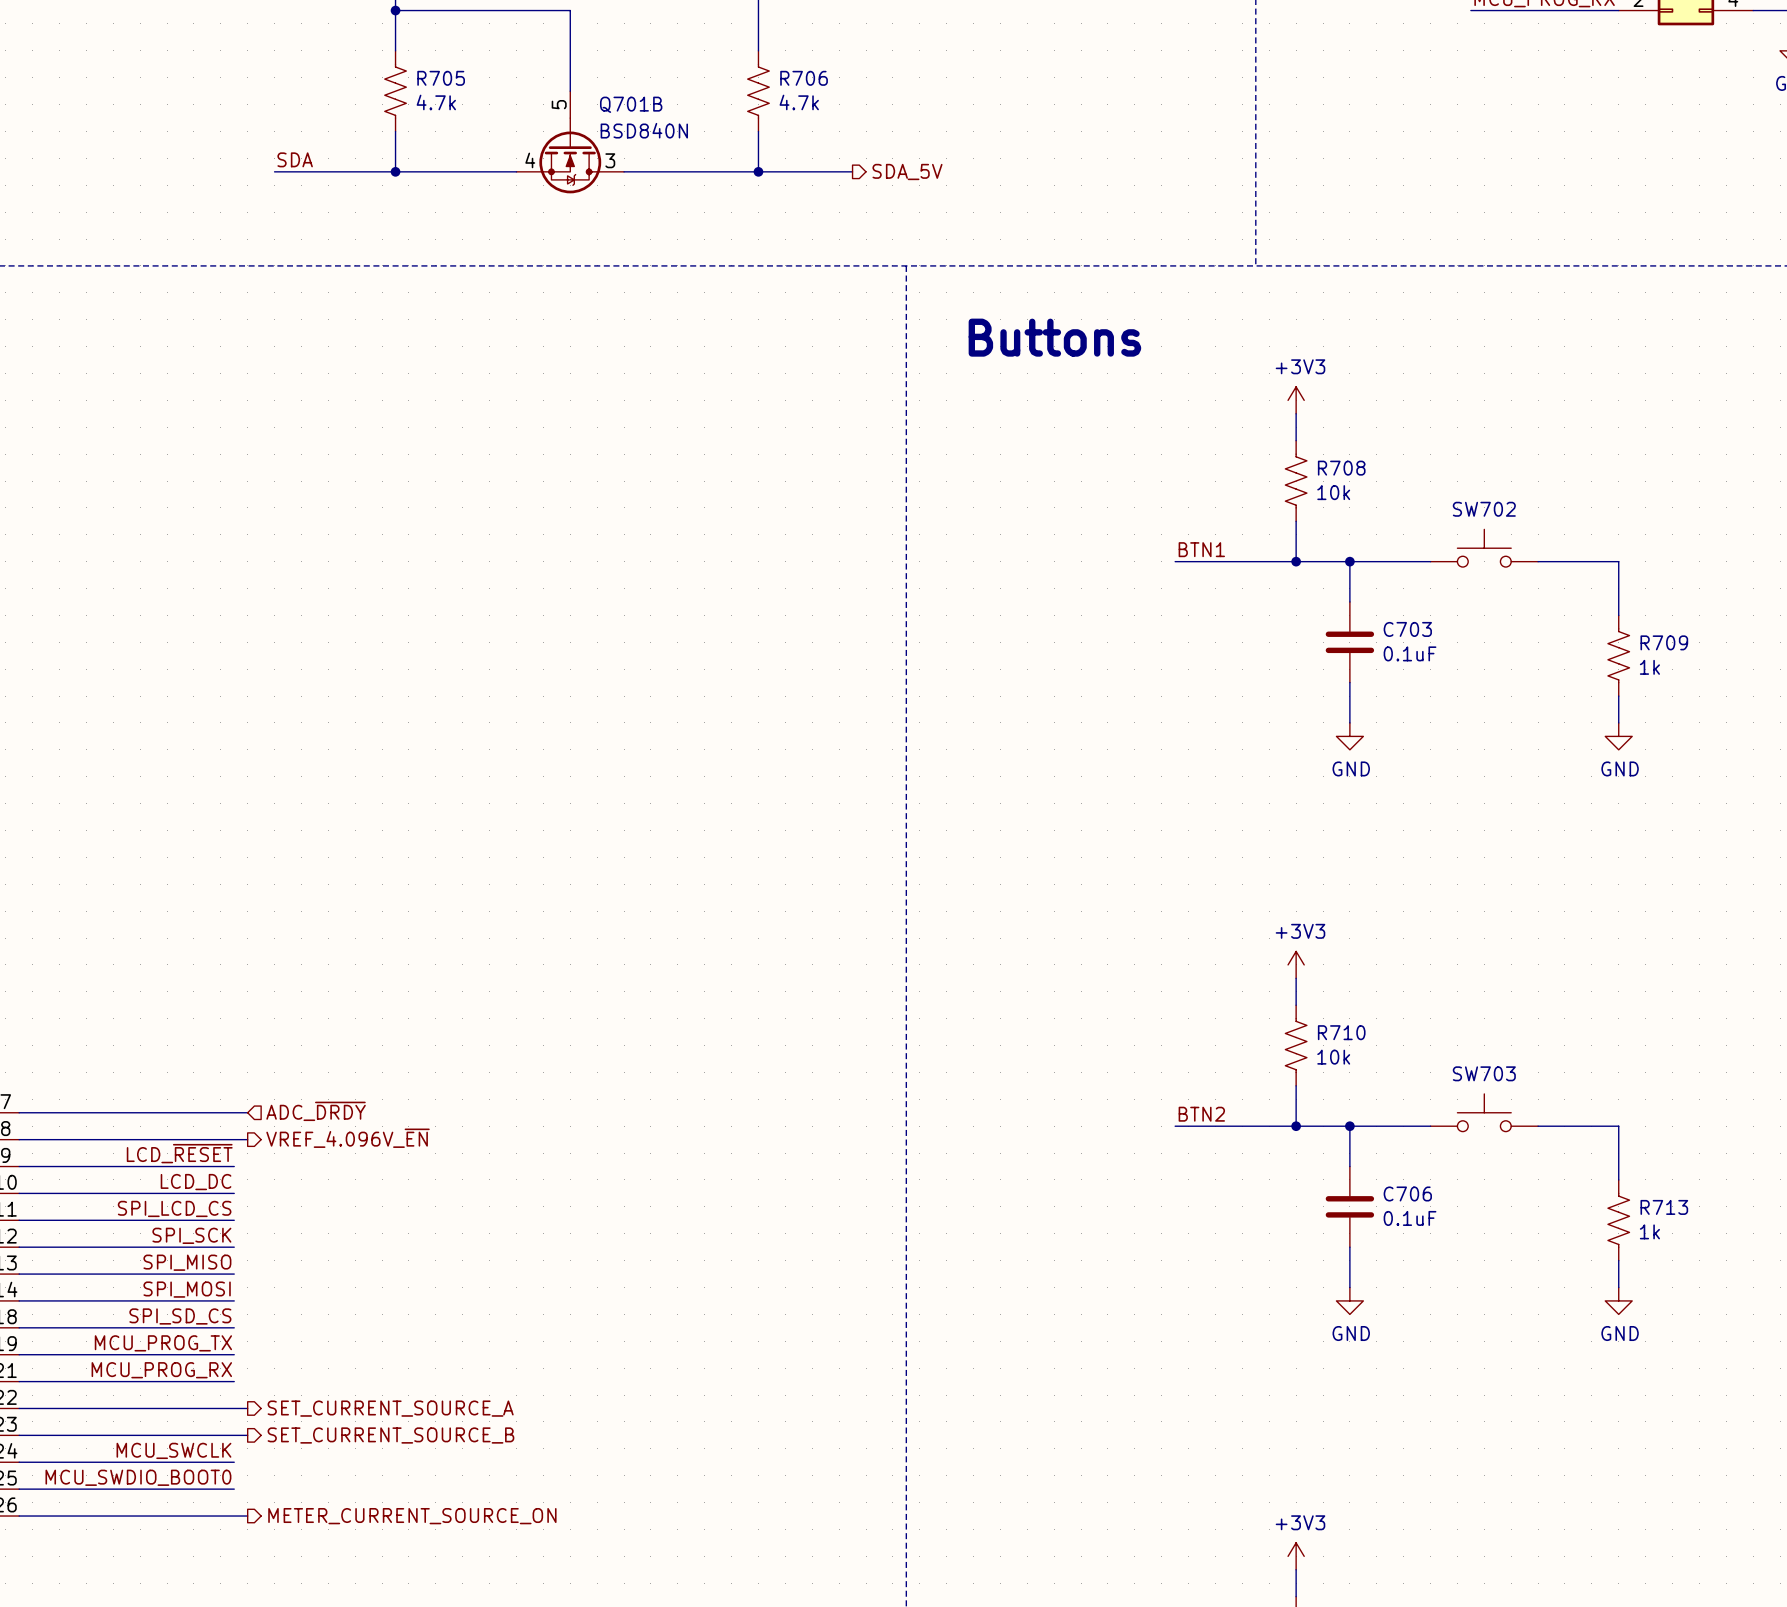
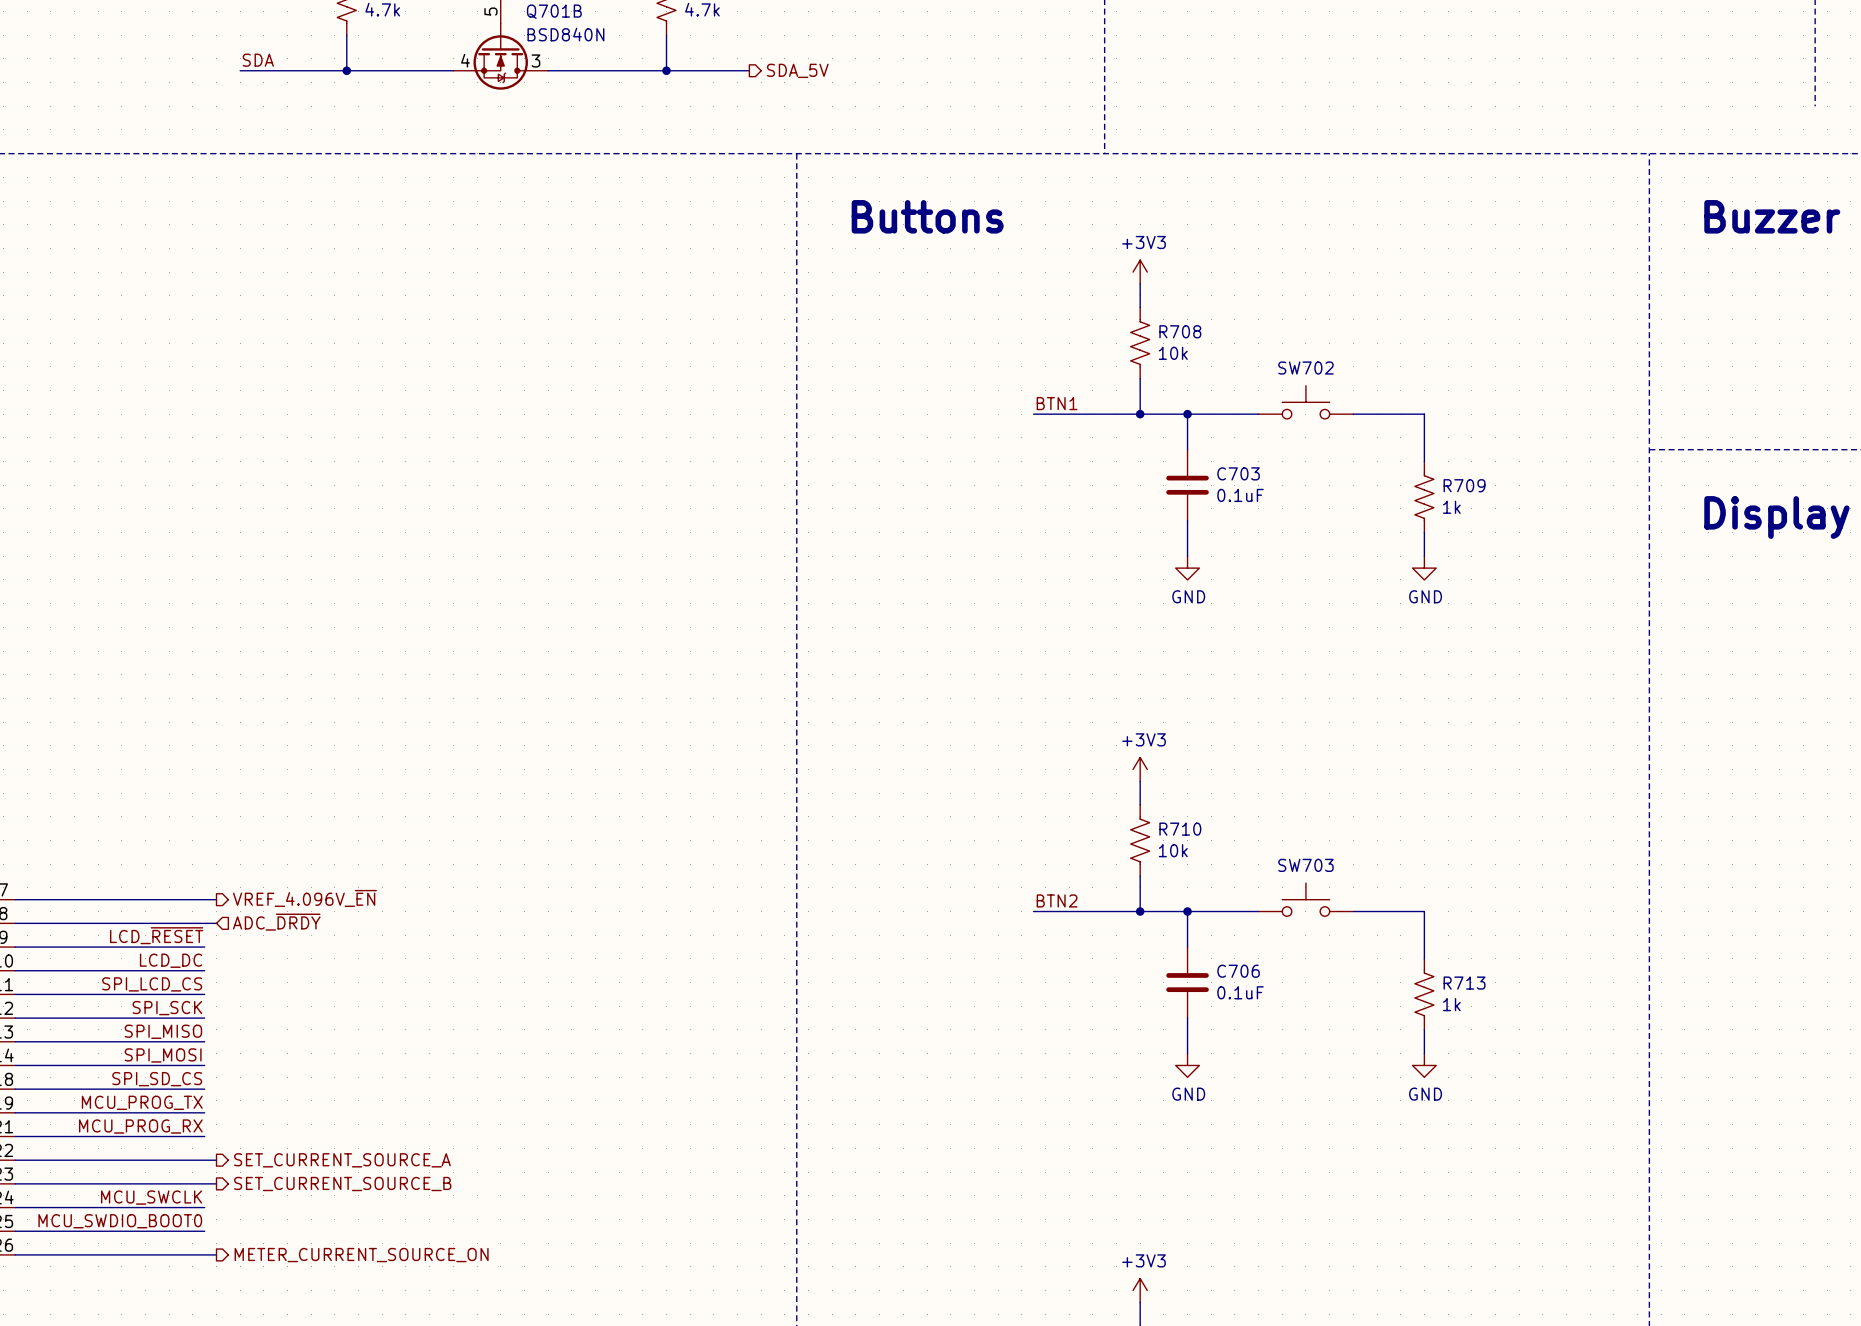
hierarchical label shape: input (316, 1111) -> output (304, 898)
hierarchical label: ADC_~{DRDY} (316, 1111) -> VREF_4.096V_~{EN} (304, 898)
hierarchical label shape: output (348, 1138) -> input (276, 922)
hierarchical label: VREF_4.096V_~{EN} (348, 1138) -> ADC_~{DRDY} (276, 922)

